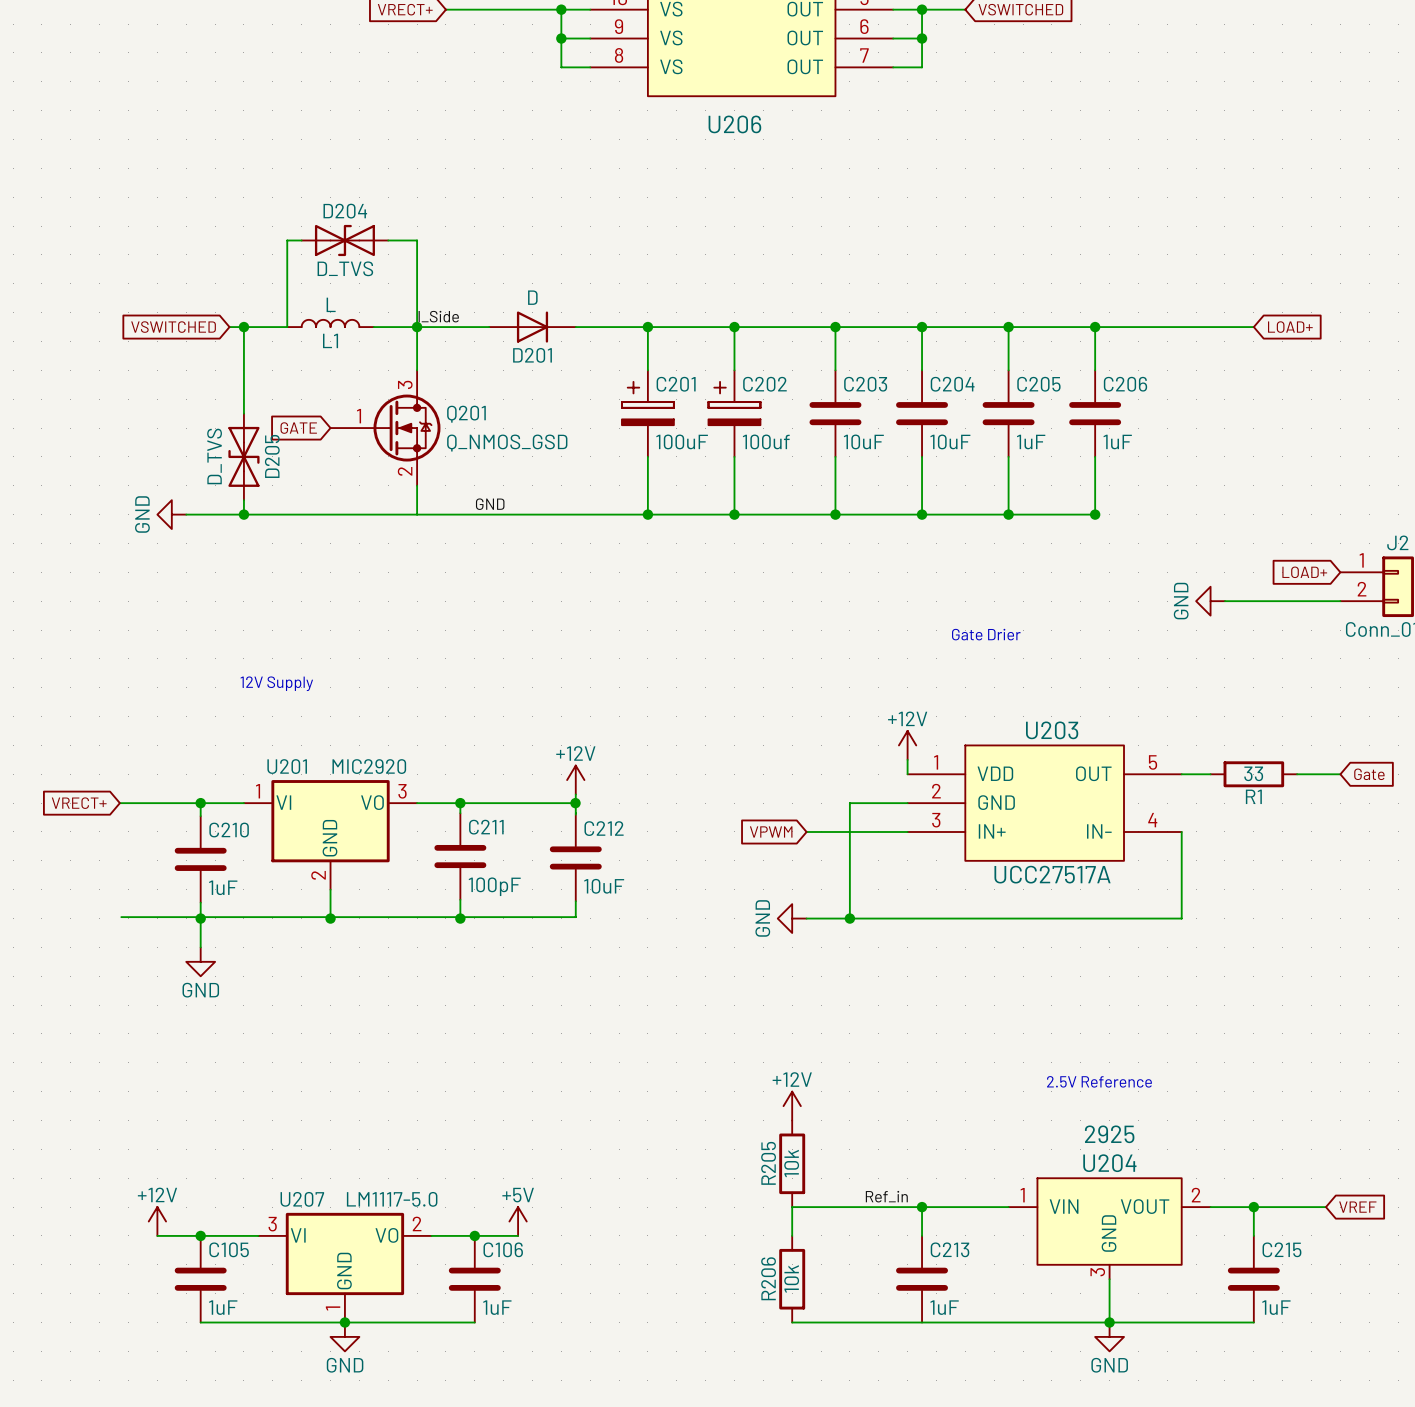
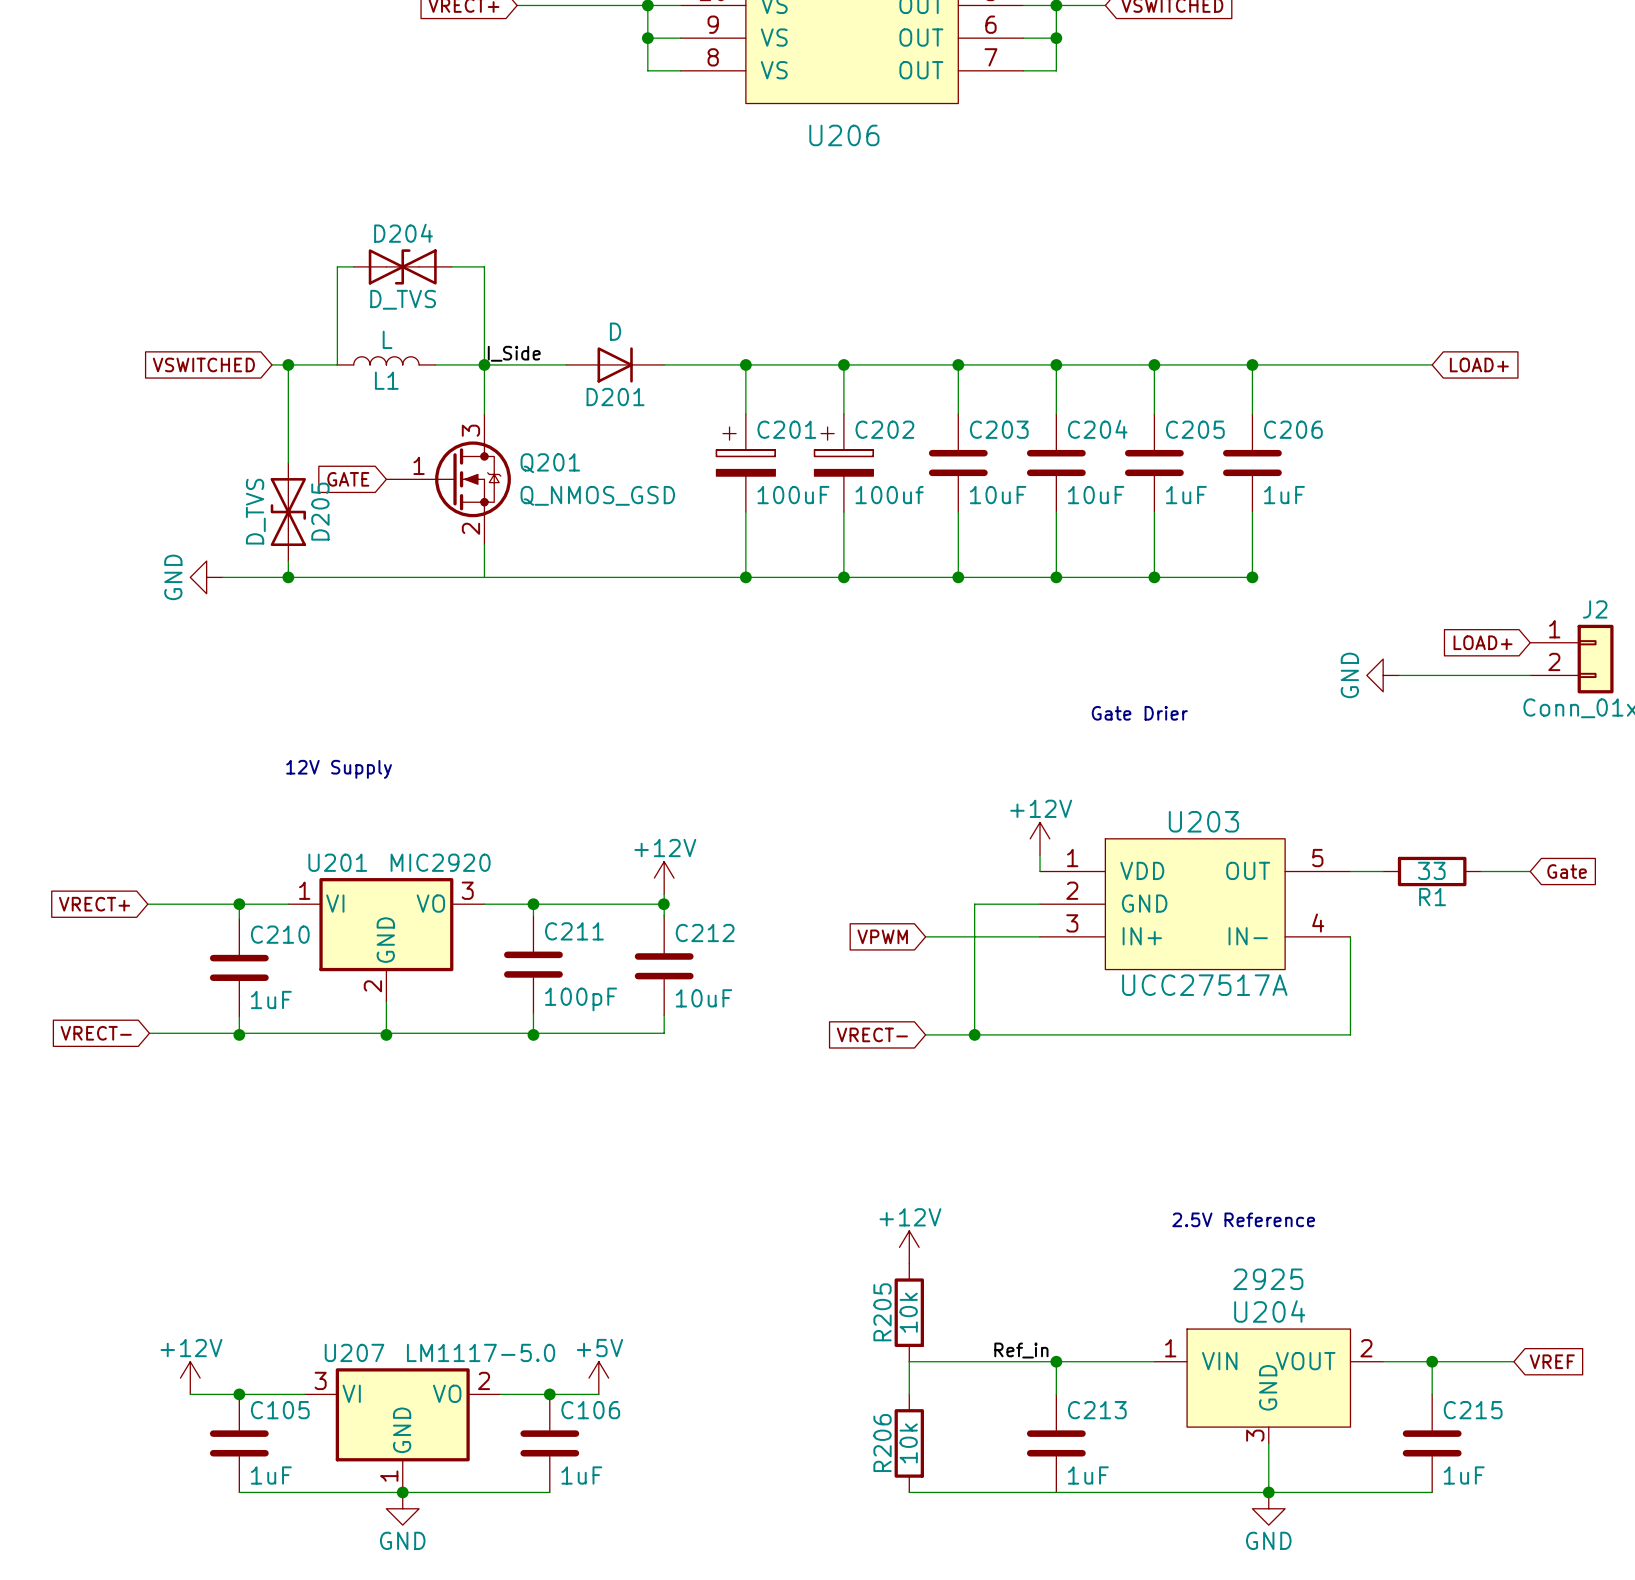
label: GND (490, 504) -> none
global label: none -> VRECT- (96, 1033)
wire: (200, 918) (200, 947) -> none
global label: none -> VRECT- (872, 1034)
power symbol: GND (792, 918) -> none
power symbol: GND (200, 961) -> none

